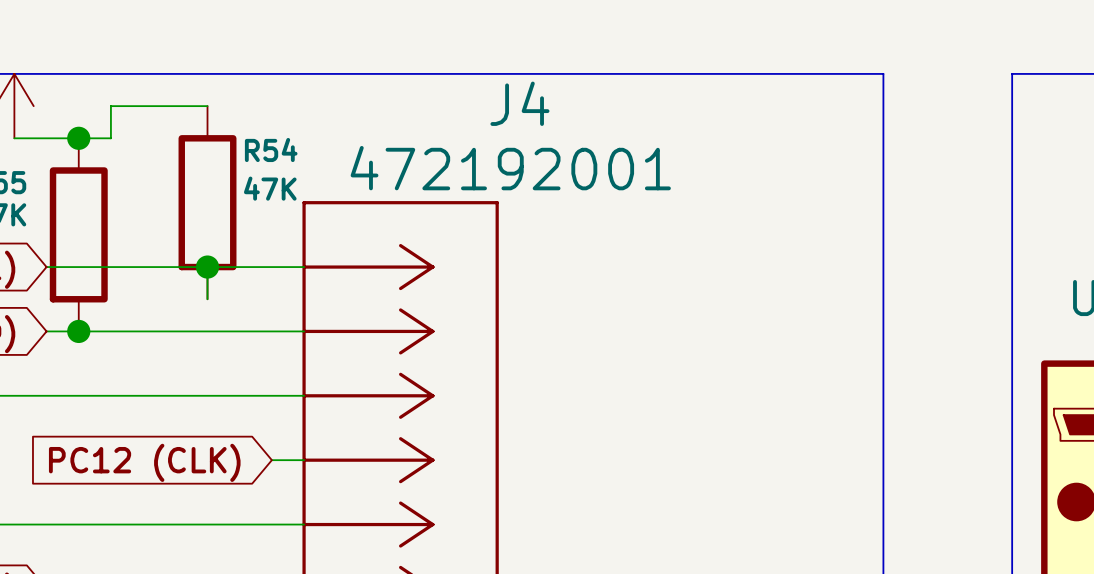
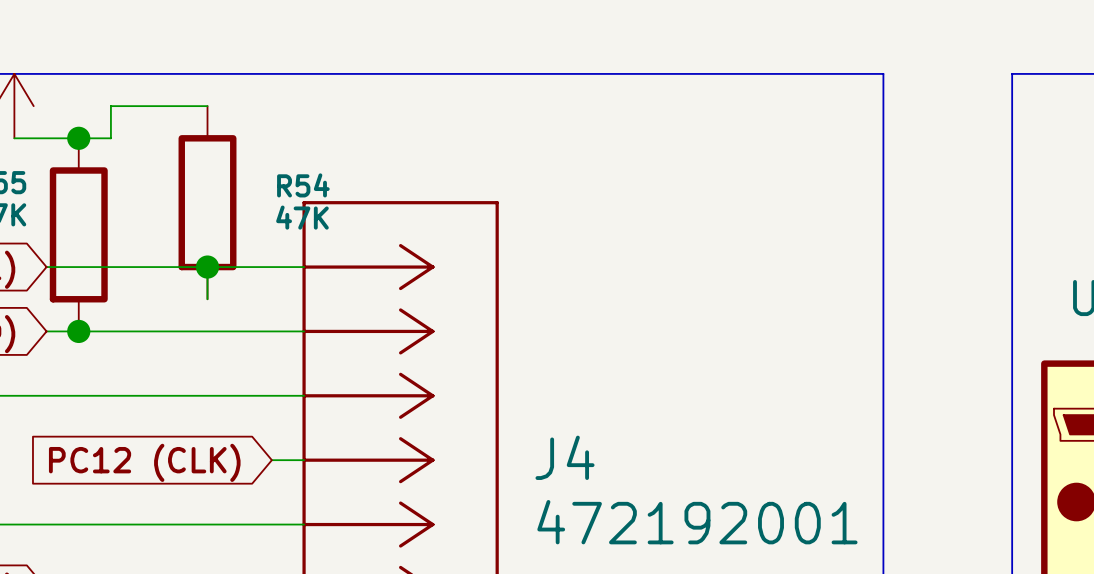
J4 name position: J4 (519, 103) -> J4 (565, 457)
R54 name position: R54 (271, 150) -> R54 (303, 185)
J4 value position: 472192001 (510, 168) -> 472192001 (697, 522)
R54 value position: 47K (270, 188) -> 47K (302, 217)

